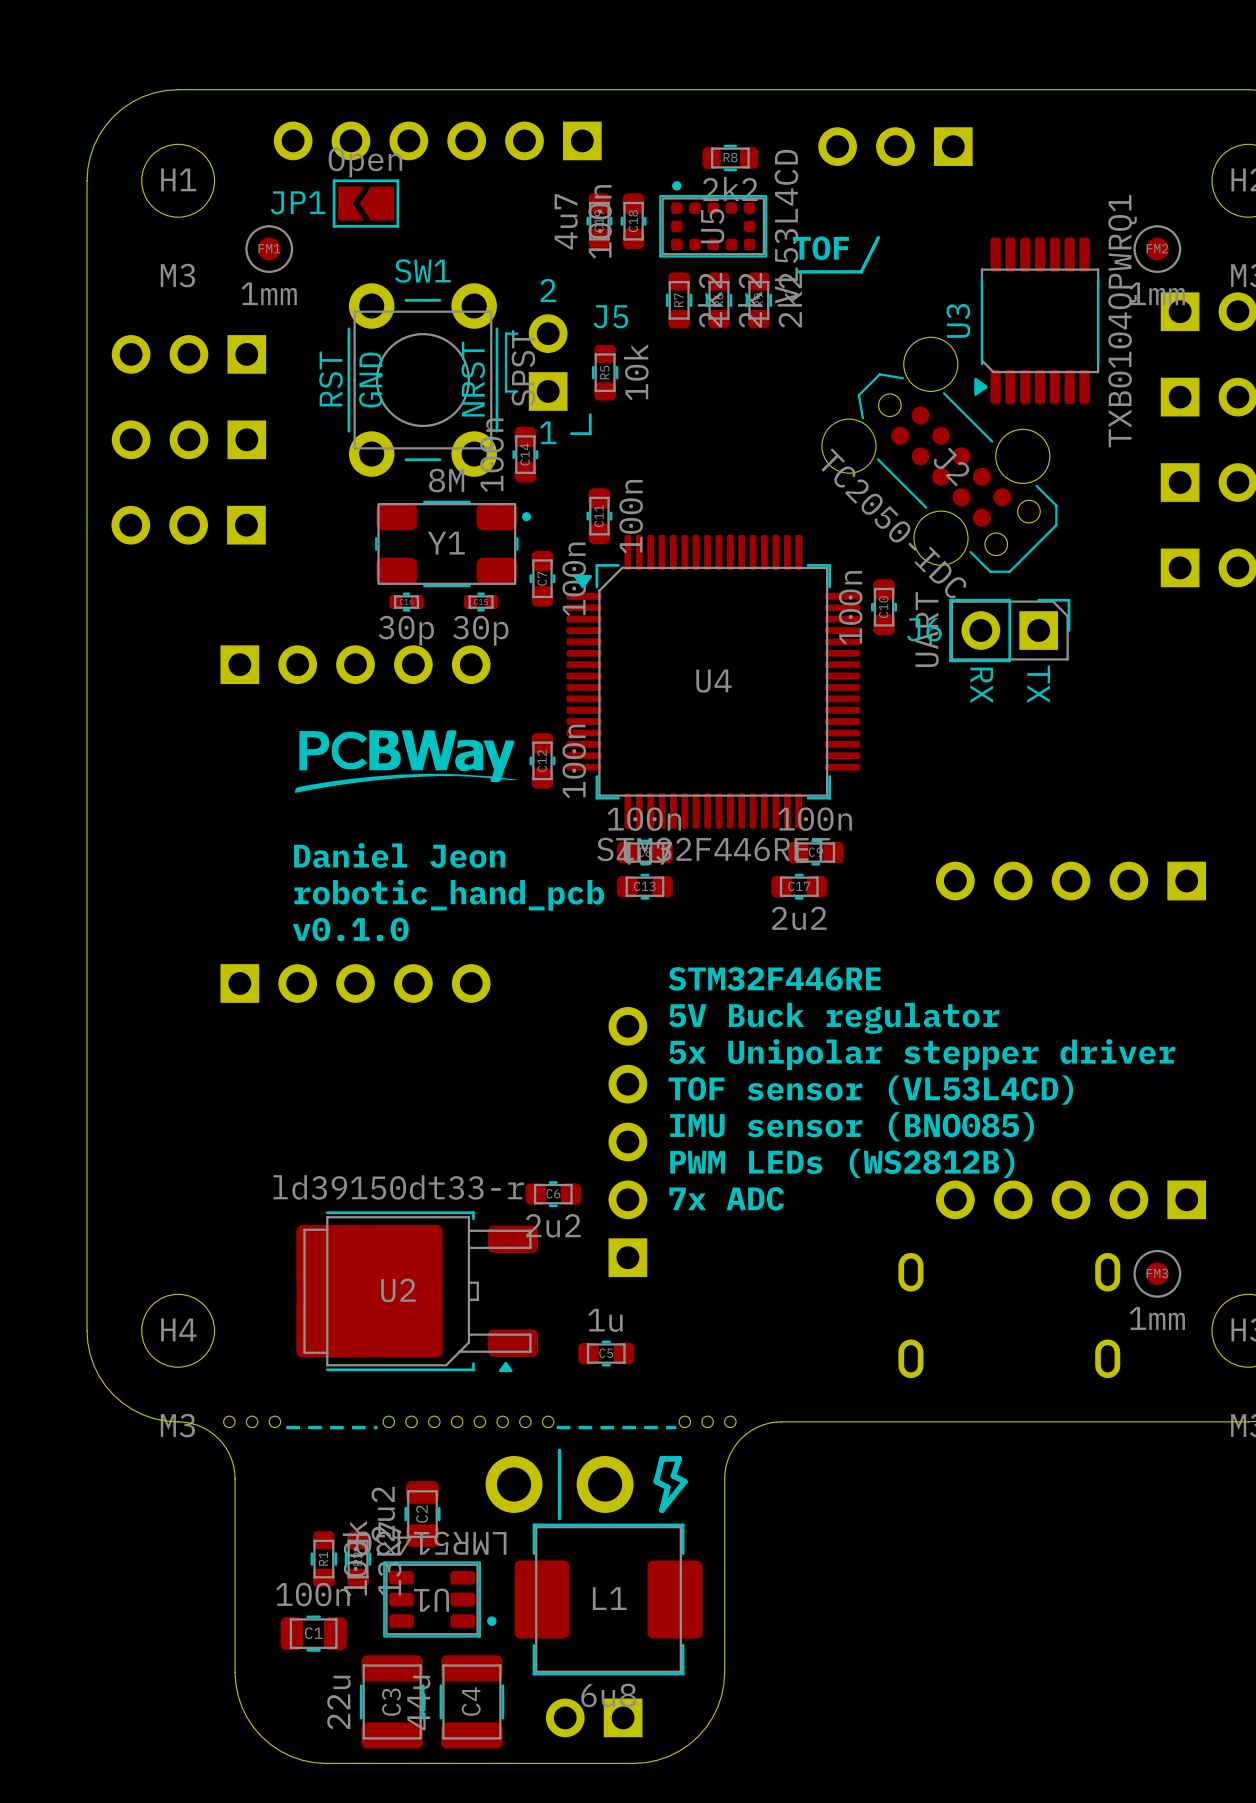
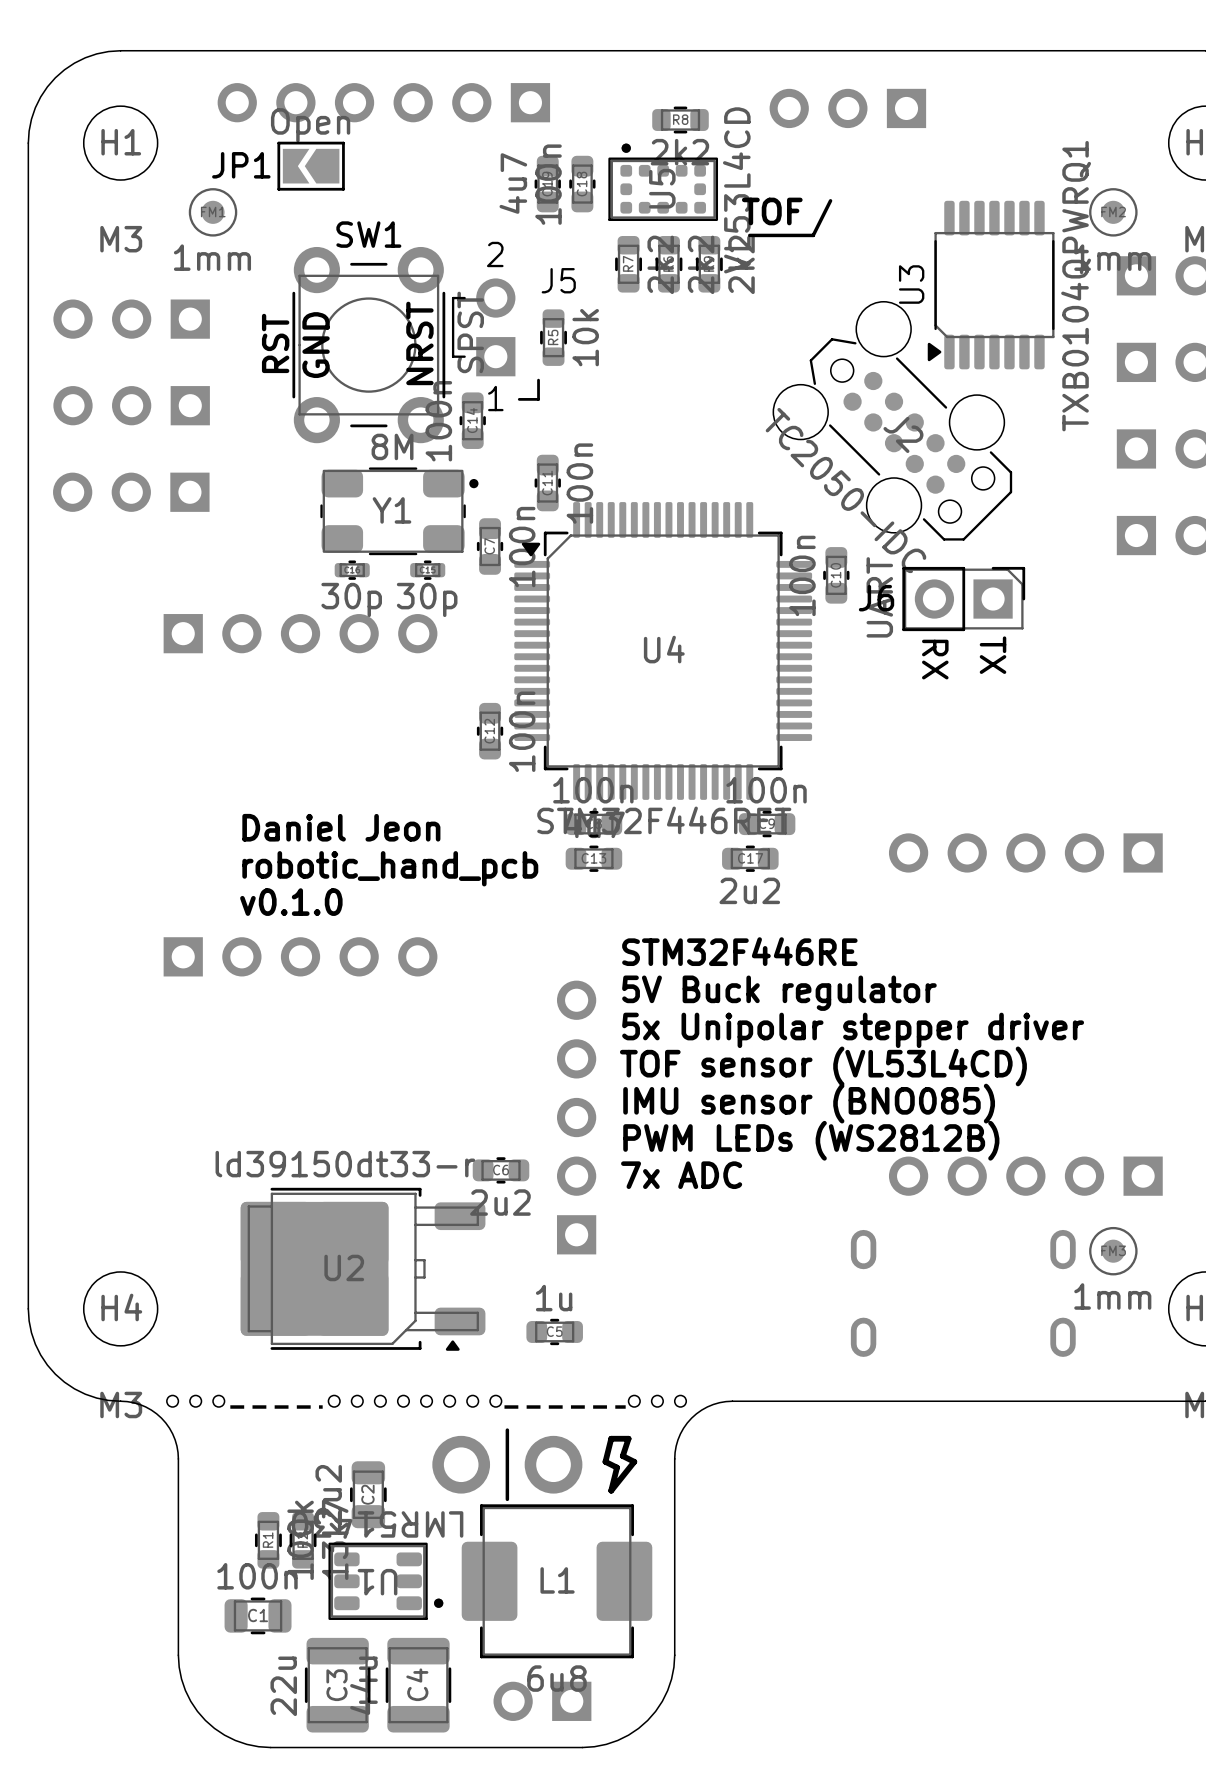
drawing: [294, 730, 517, 793] -> none

